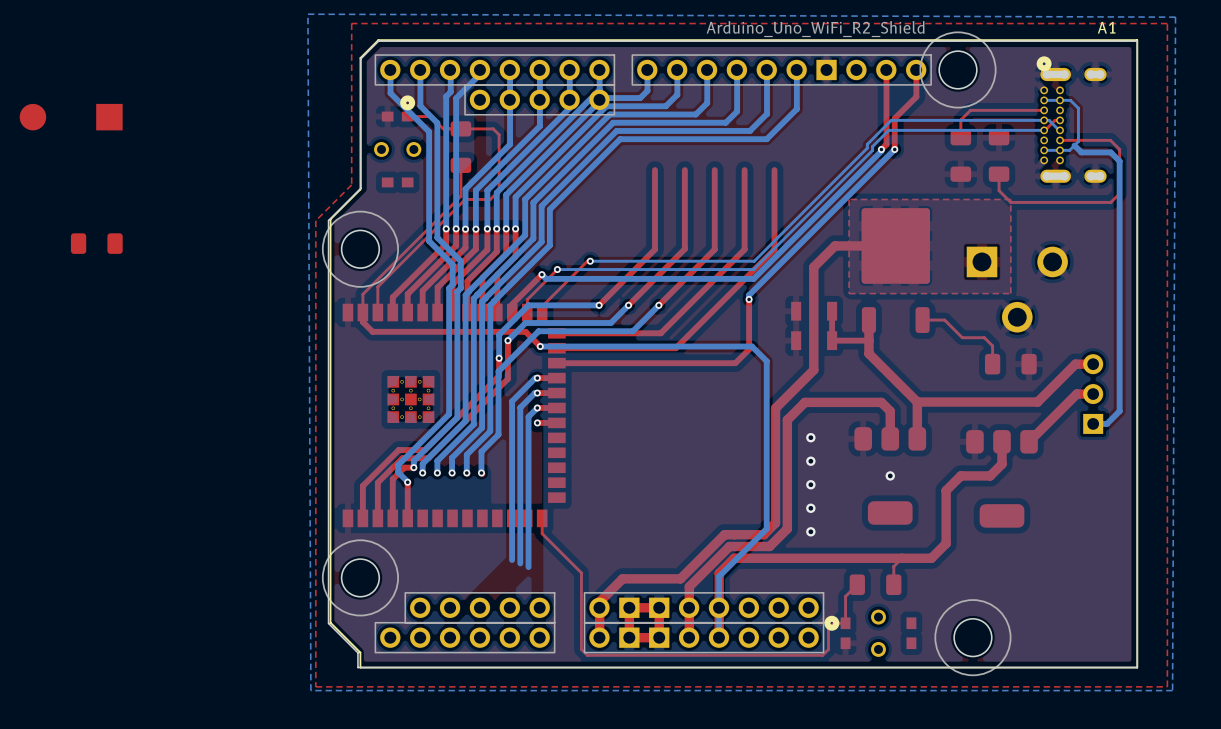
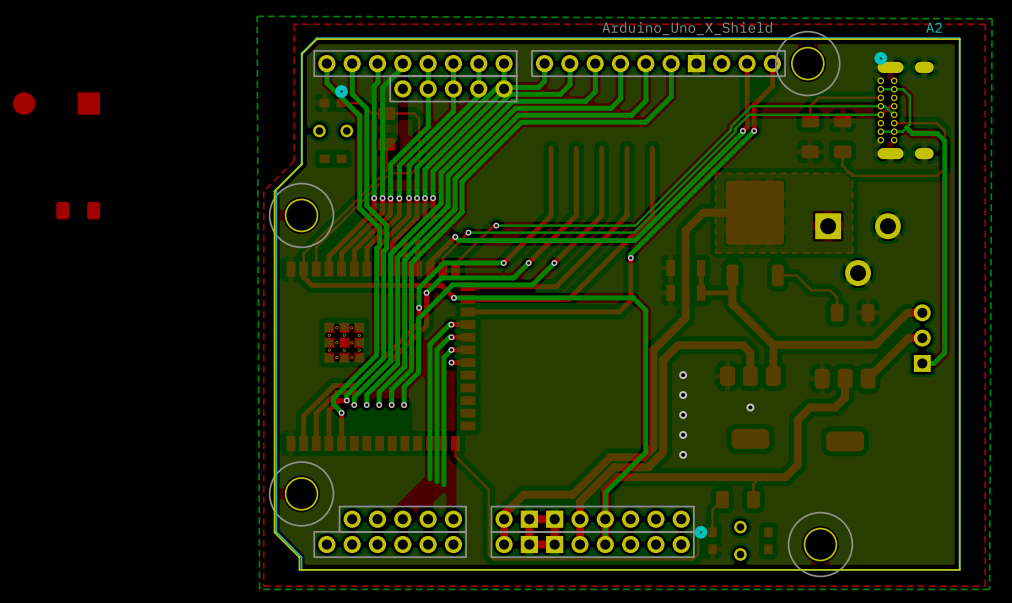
A1 name: A1 (1106, 27) -> A2 (934, 27)
A1 value: Arduino_Uno_WiFi_R2_Shield (815, 29) -> Arduino_Uno_X_Shield (687, 28)

